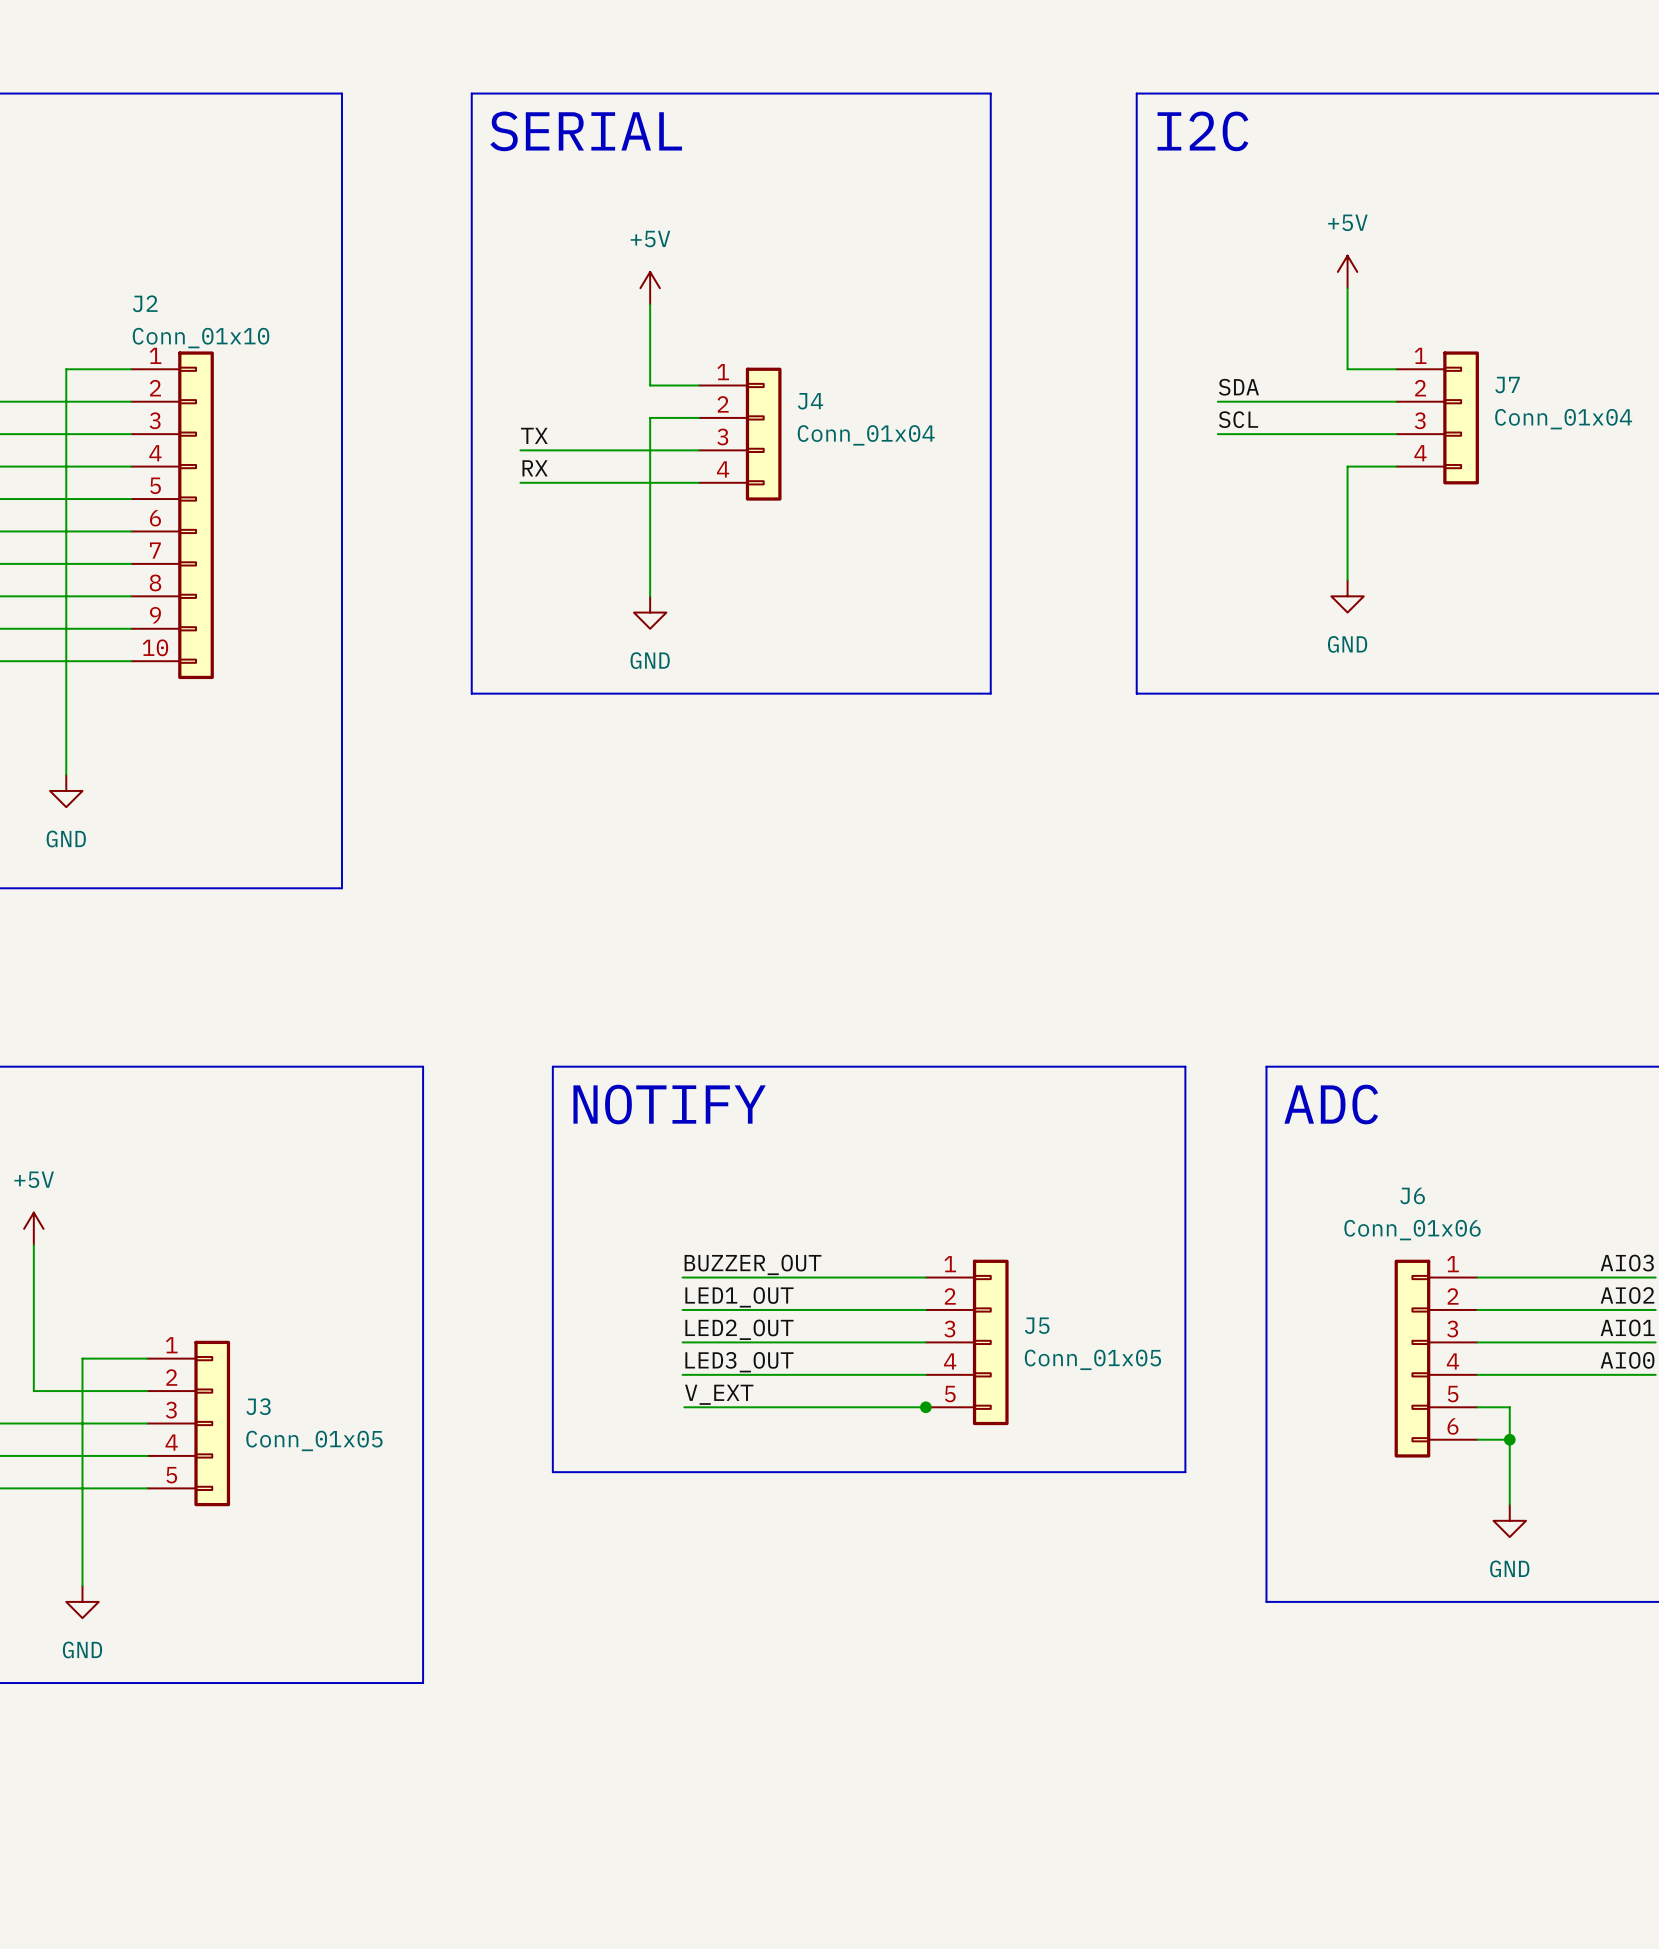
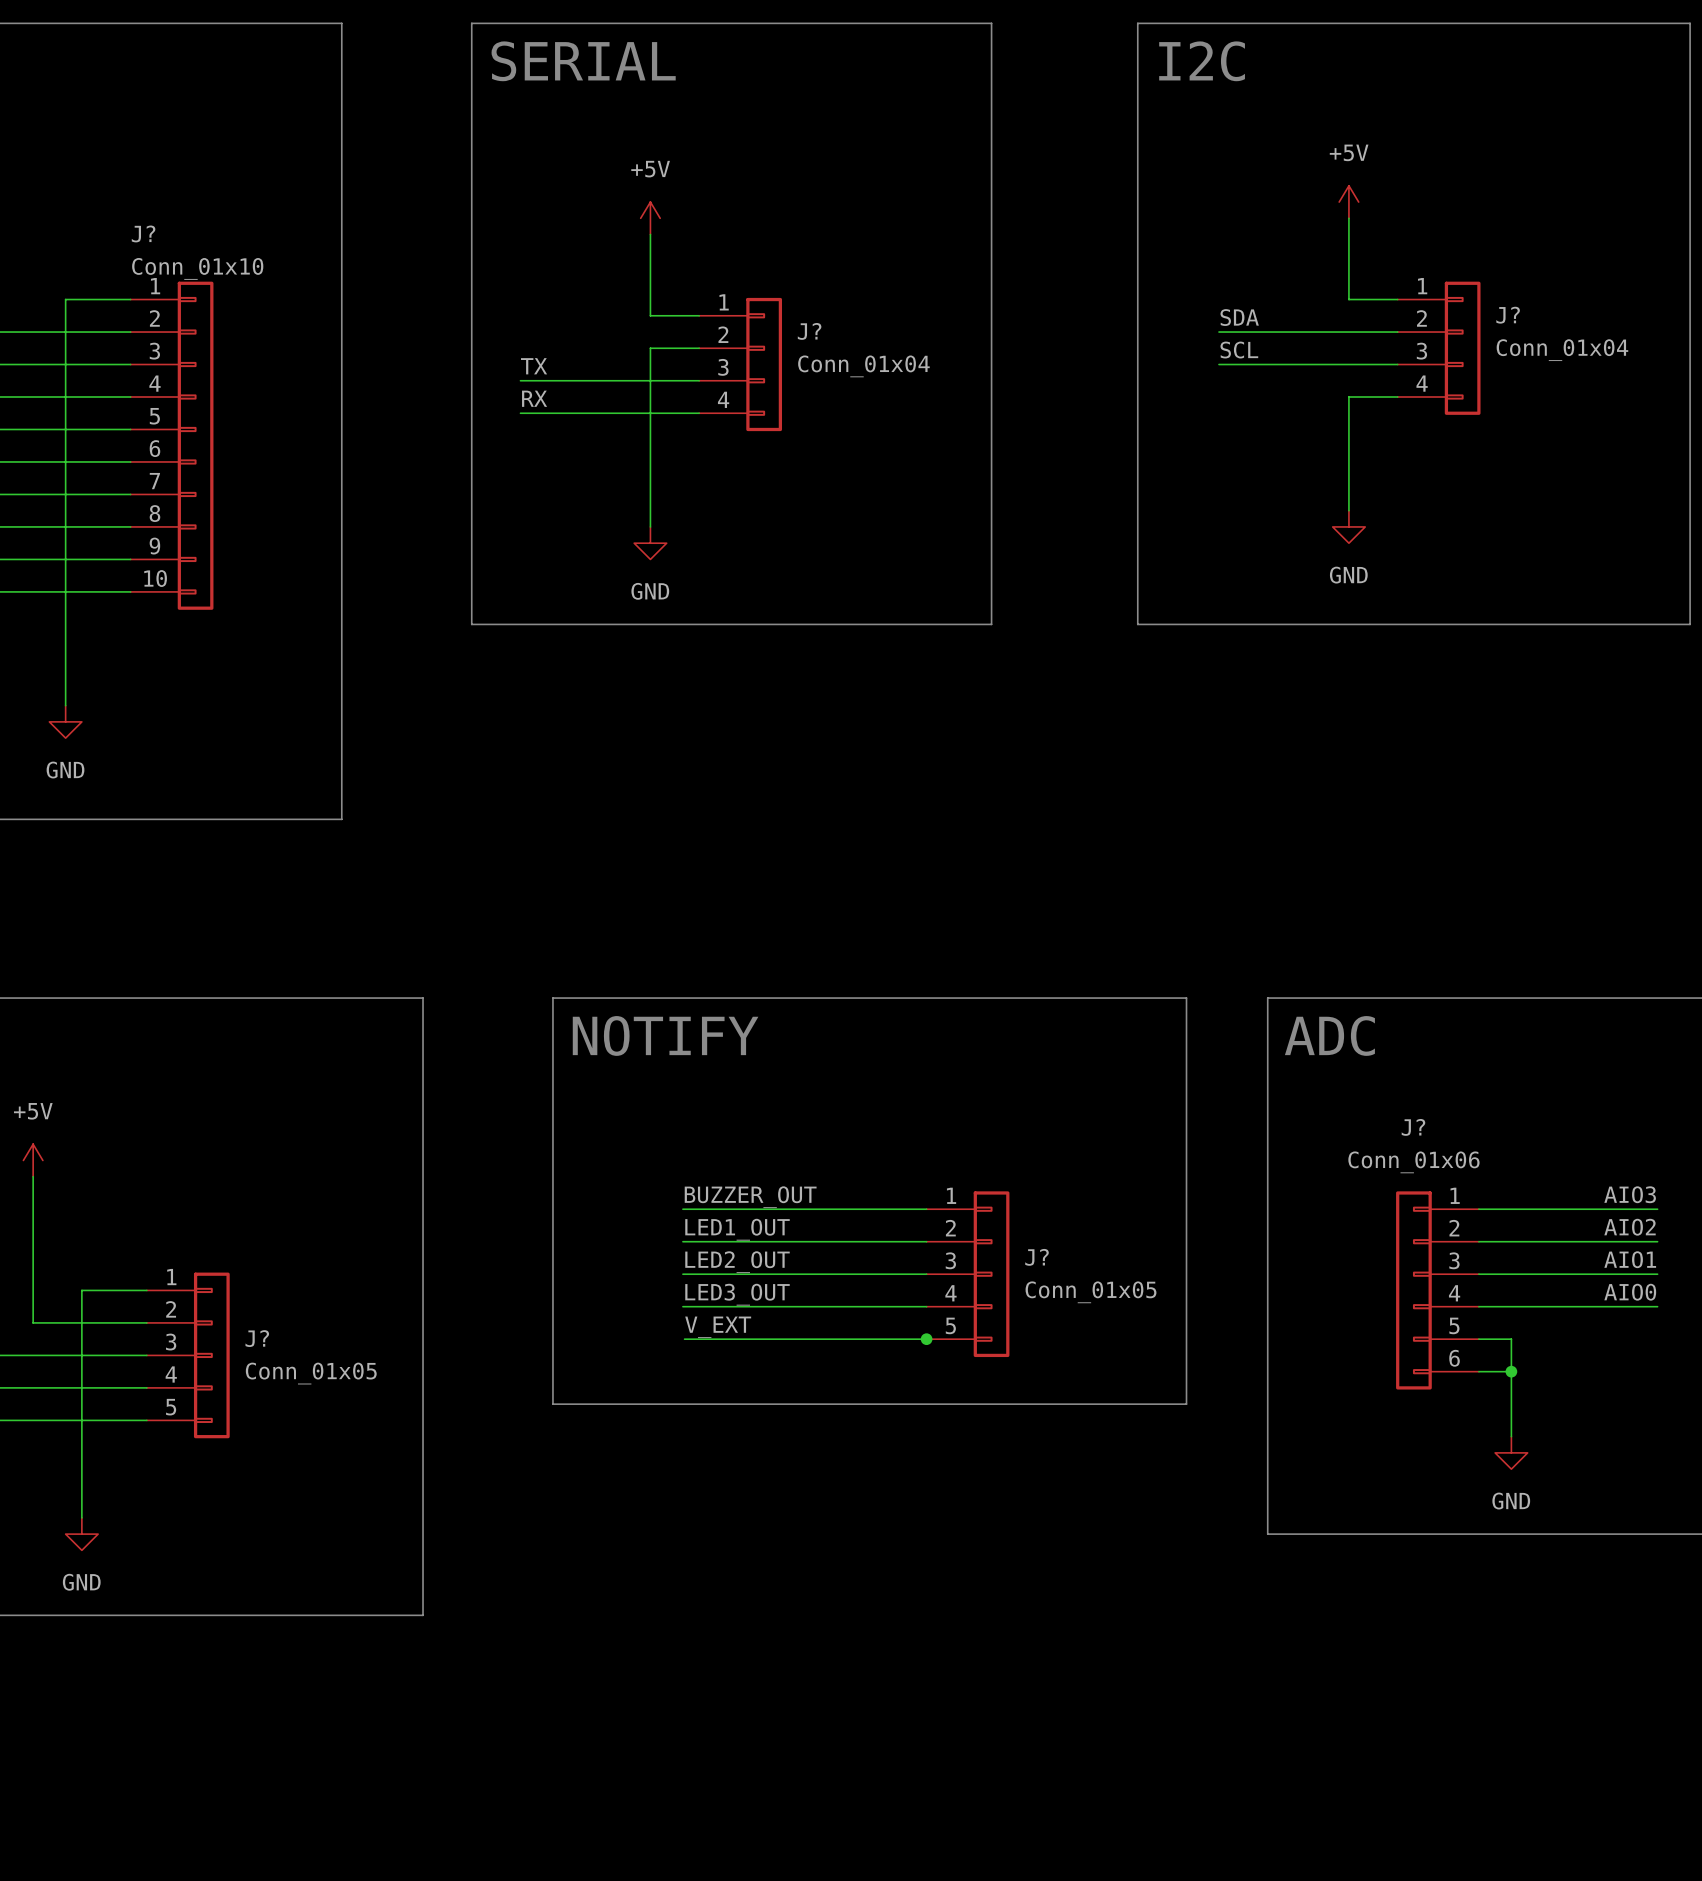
J2 name: J2 (145, 303) -> J? (143, 233)
J7 name: J7 (1507, 385) -> J? (1508, 315)
J4 name: J4 (810, 401) -> J? (809, 331)
J6 name: J6 (1412, 1195) -> J? (1413, 1127)
J5 name: J5 (1037, 1325) -> J? (1037, 1257)
J3 name: J3 (258, 1406) -> J? (257, 1338)

